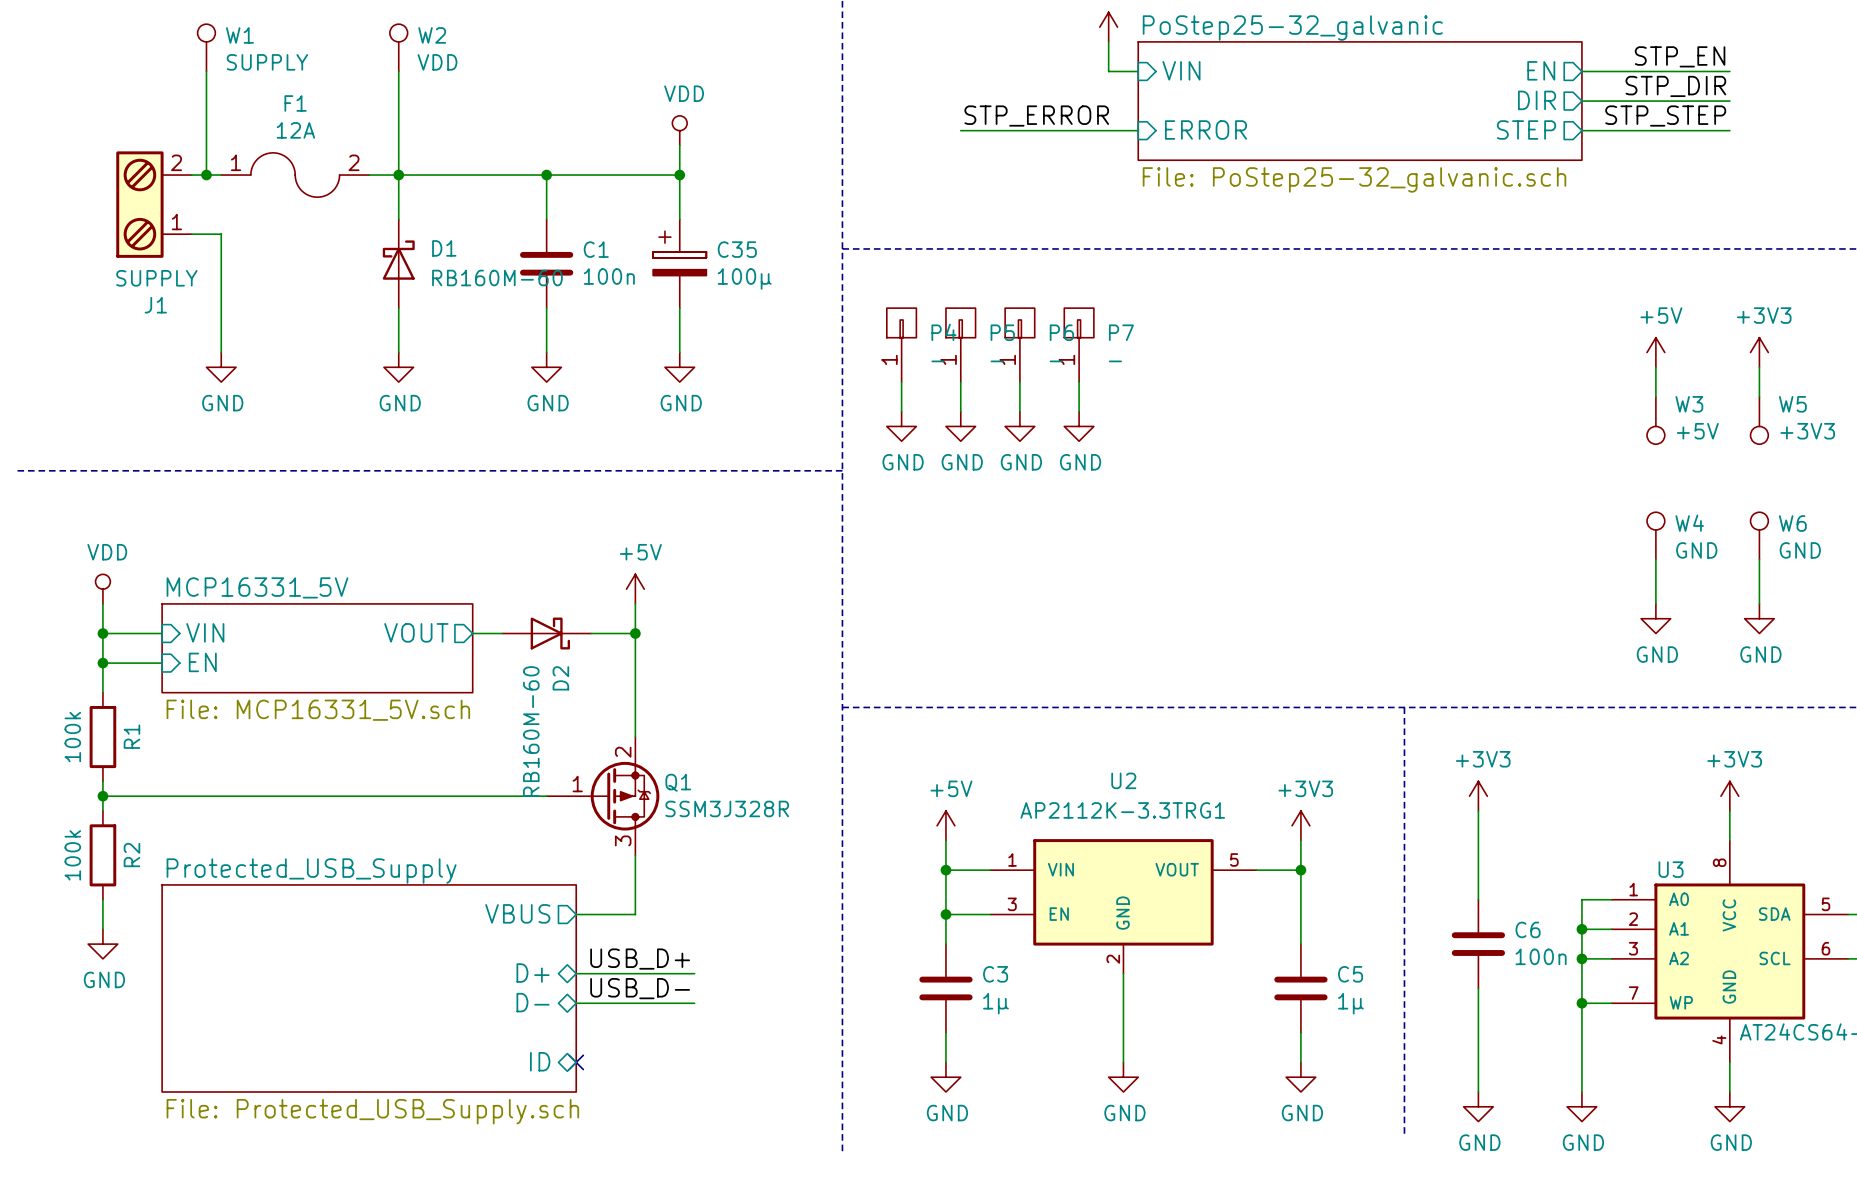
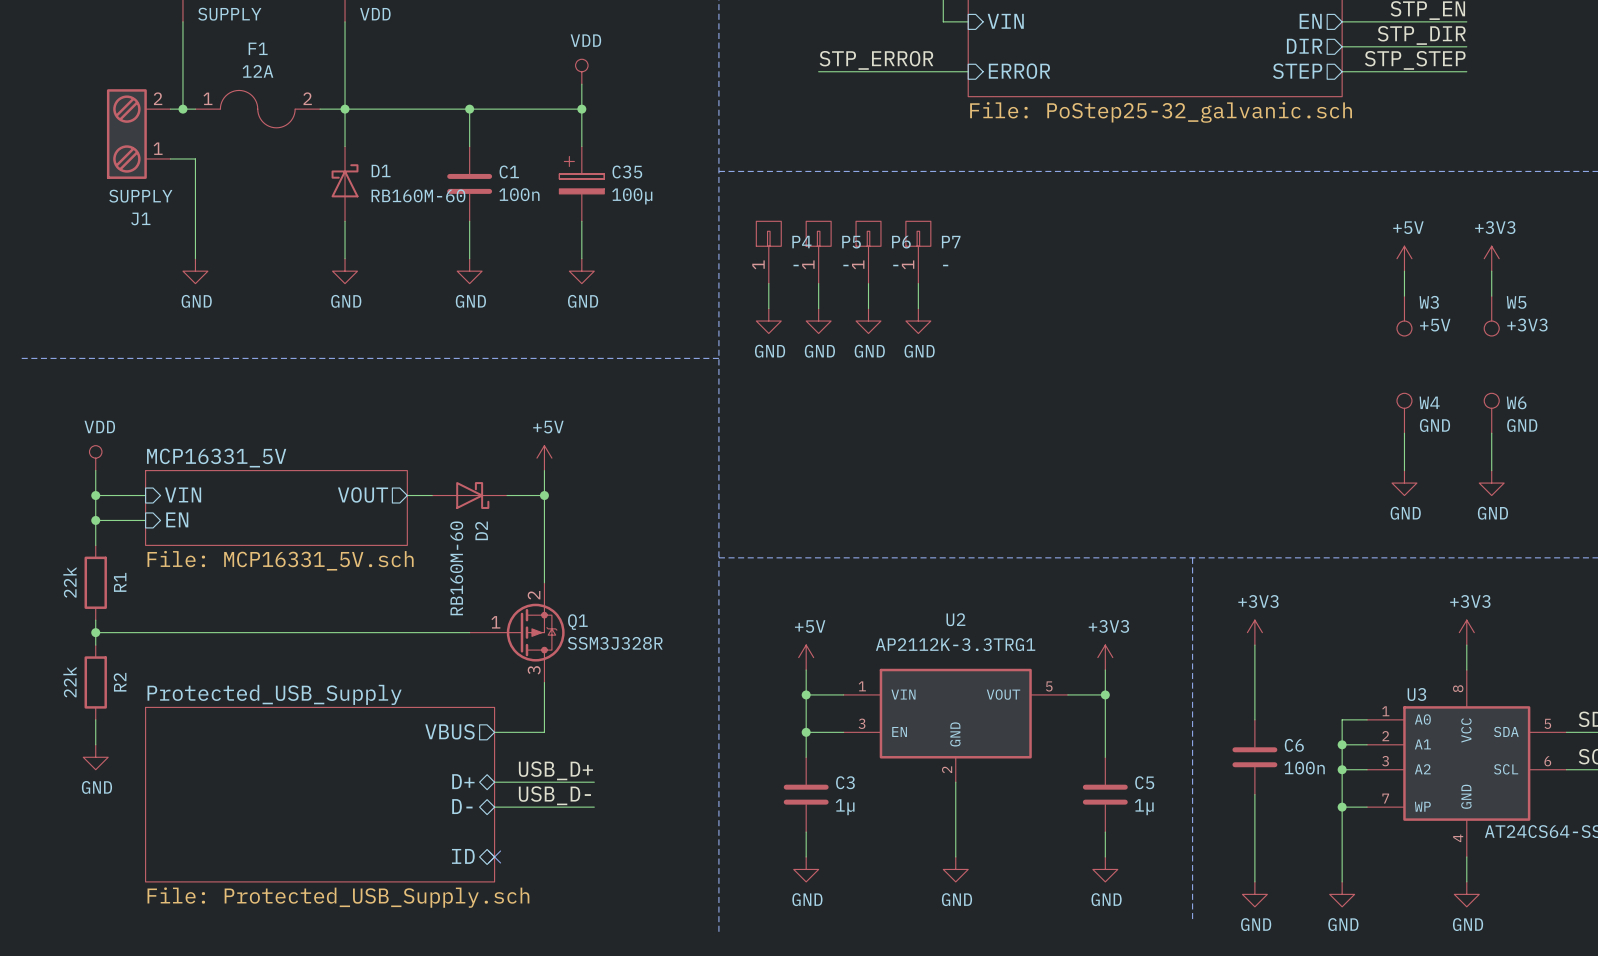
R1 value: 100k (72, 737) -> 22k (69, 582)
R2 value: 100k (72, 855) -> 22k (69, 682)

